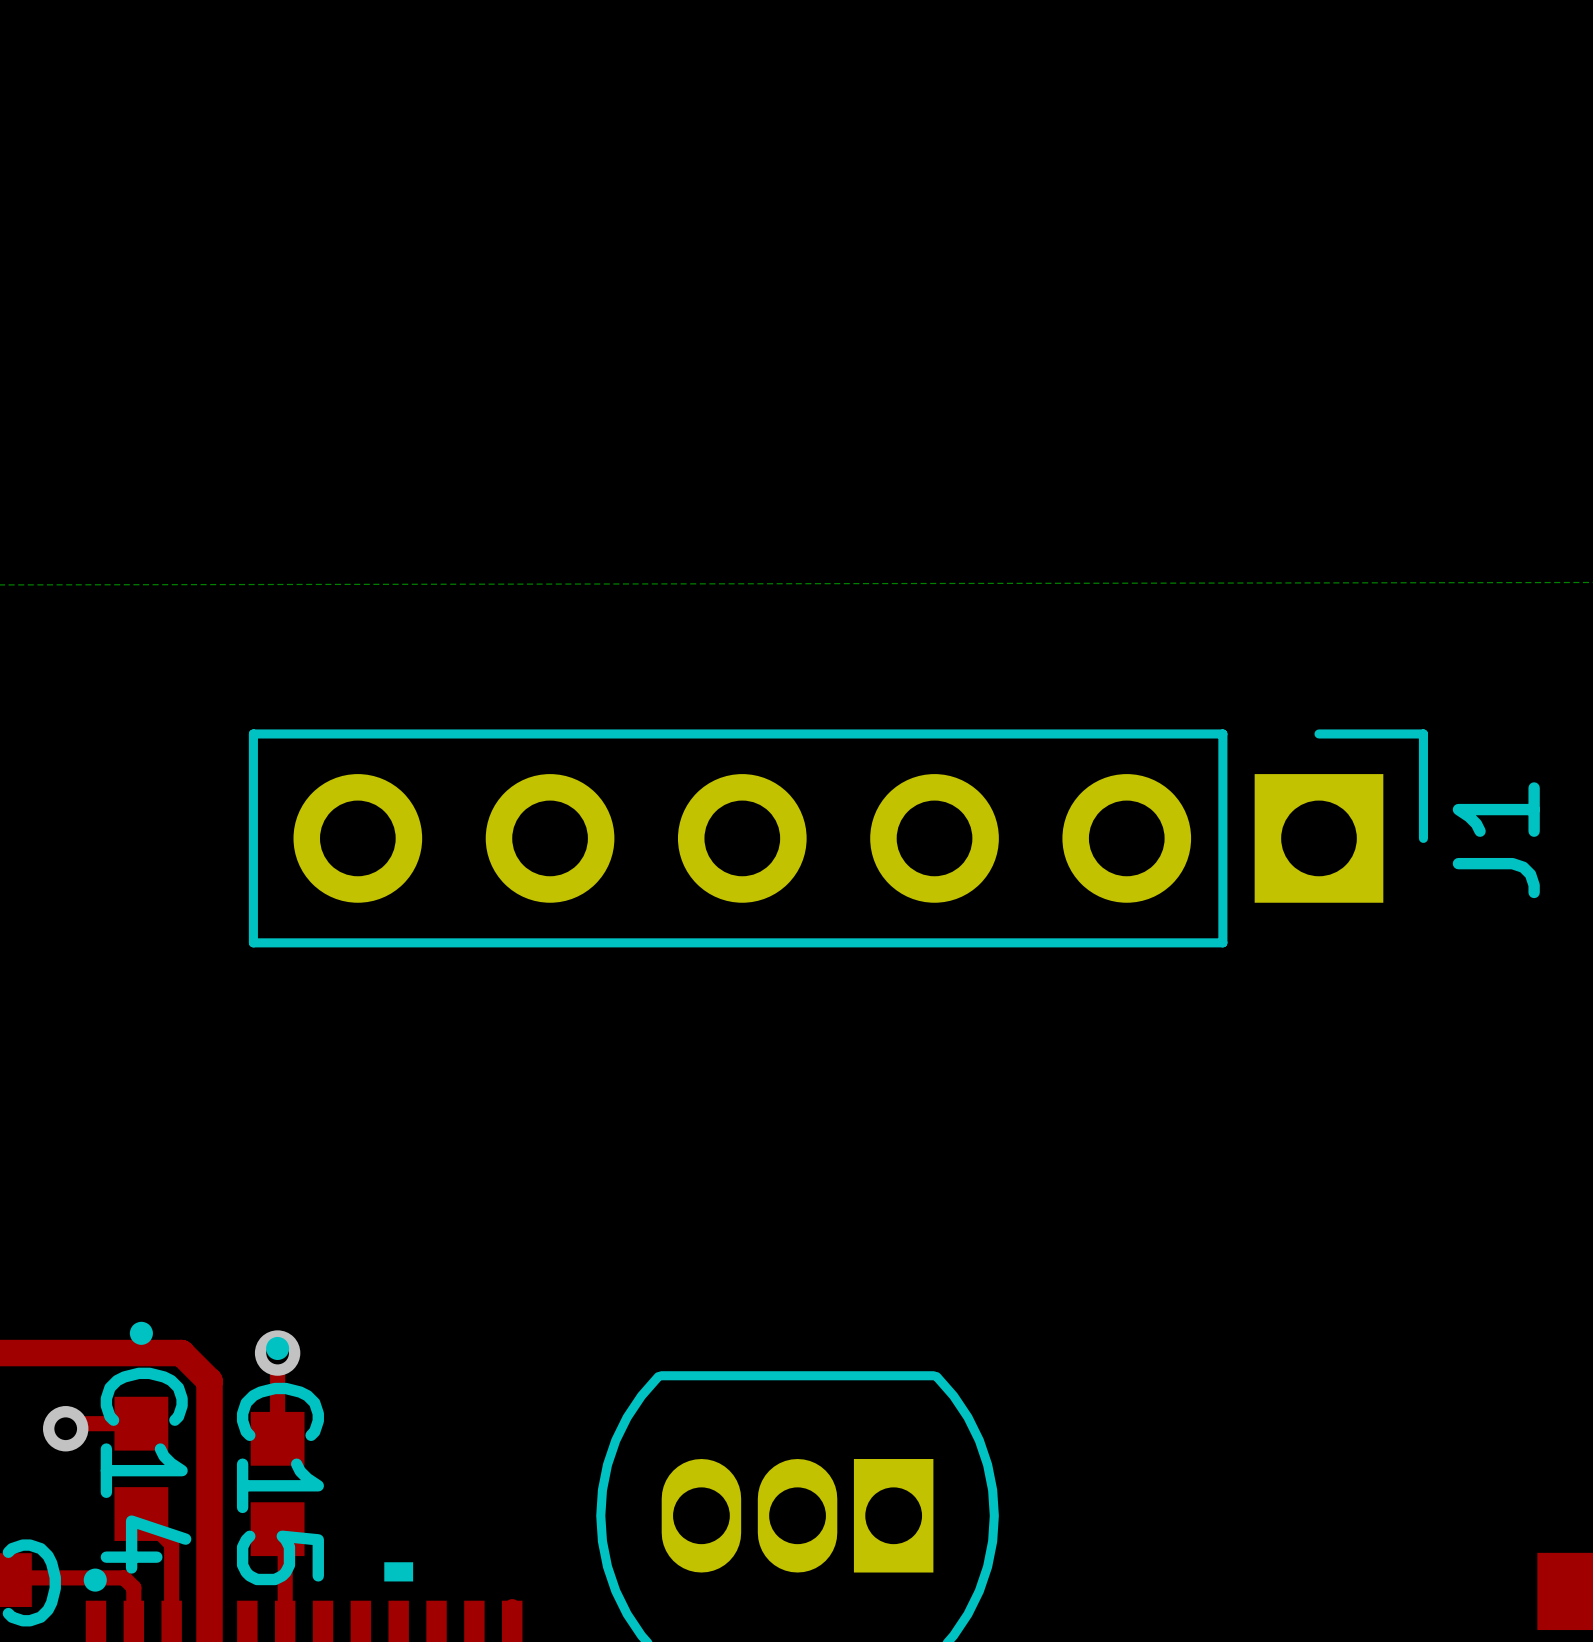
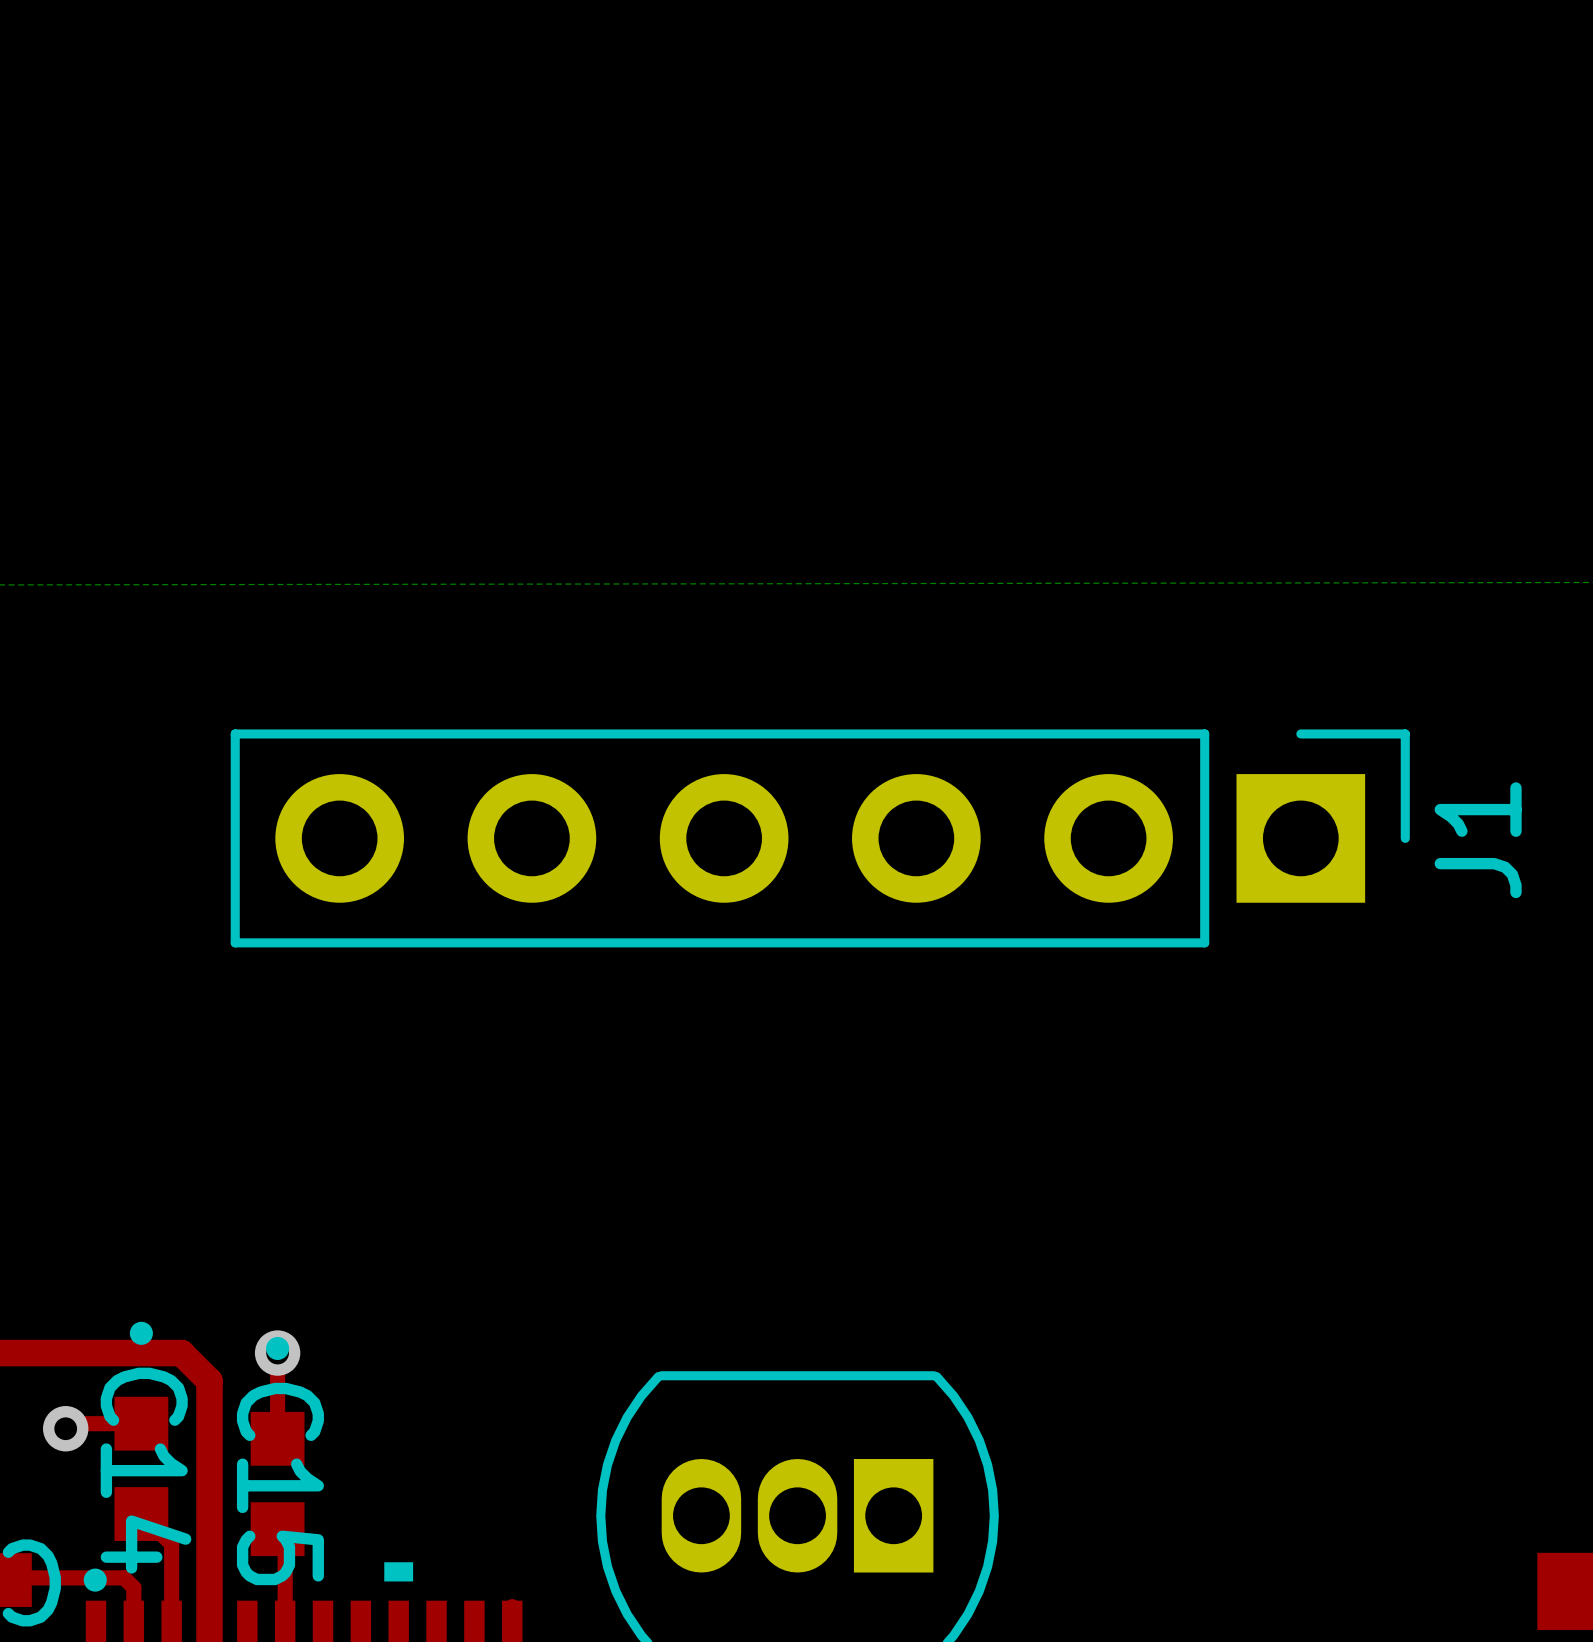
J1 position: (838, 838) -> (820, 838)

